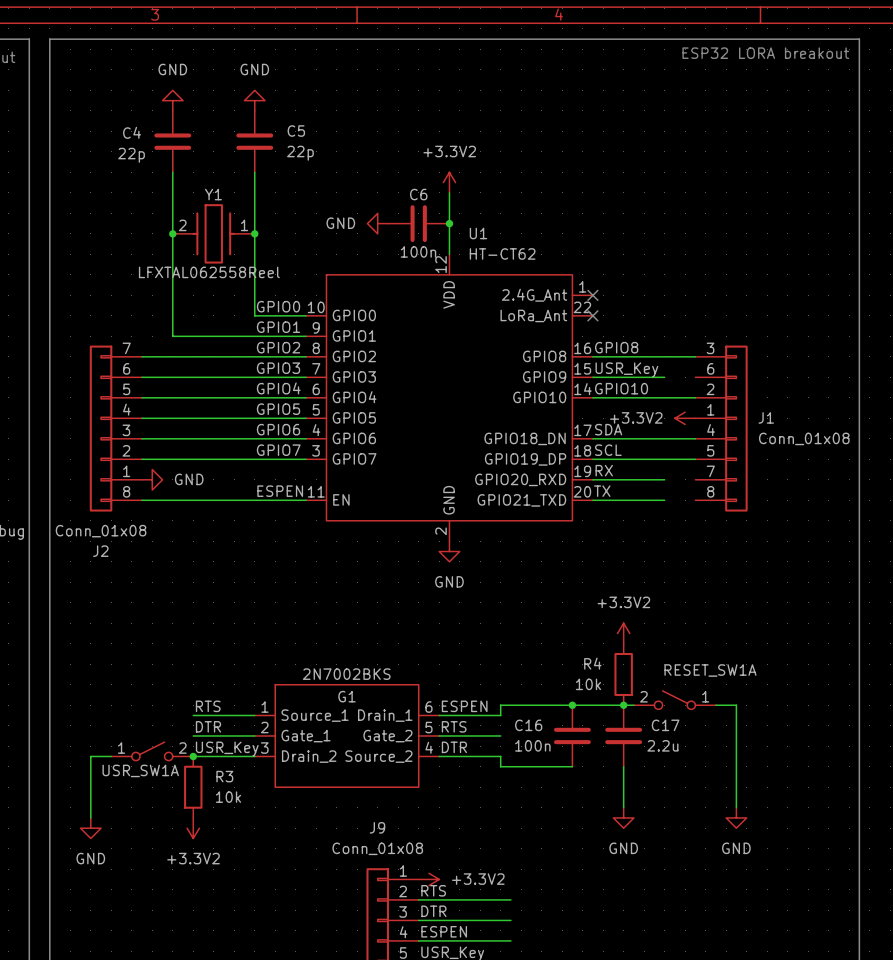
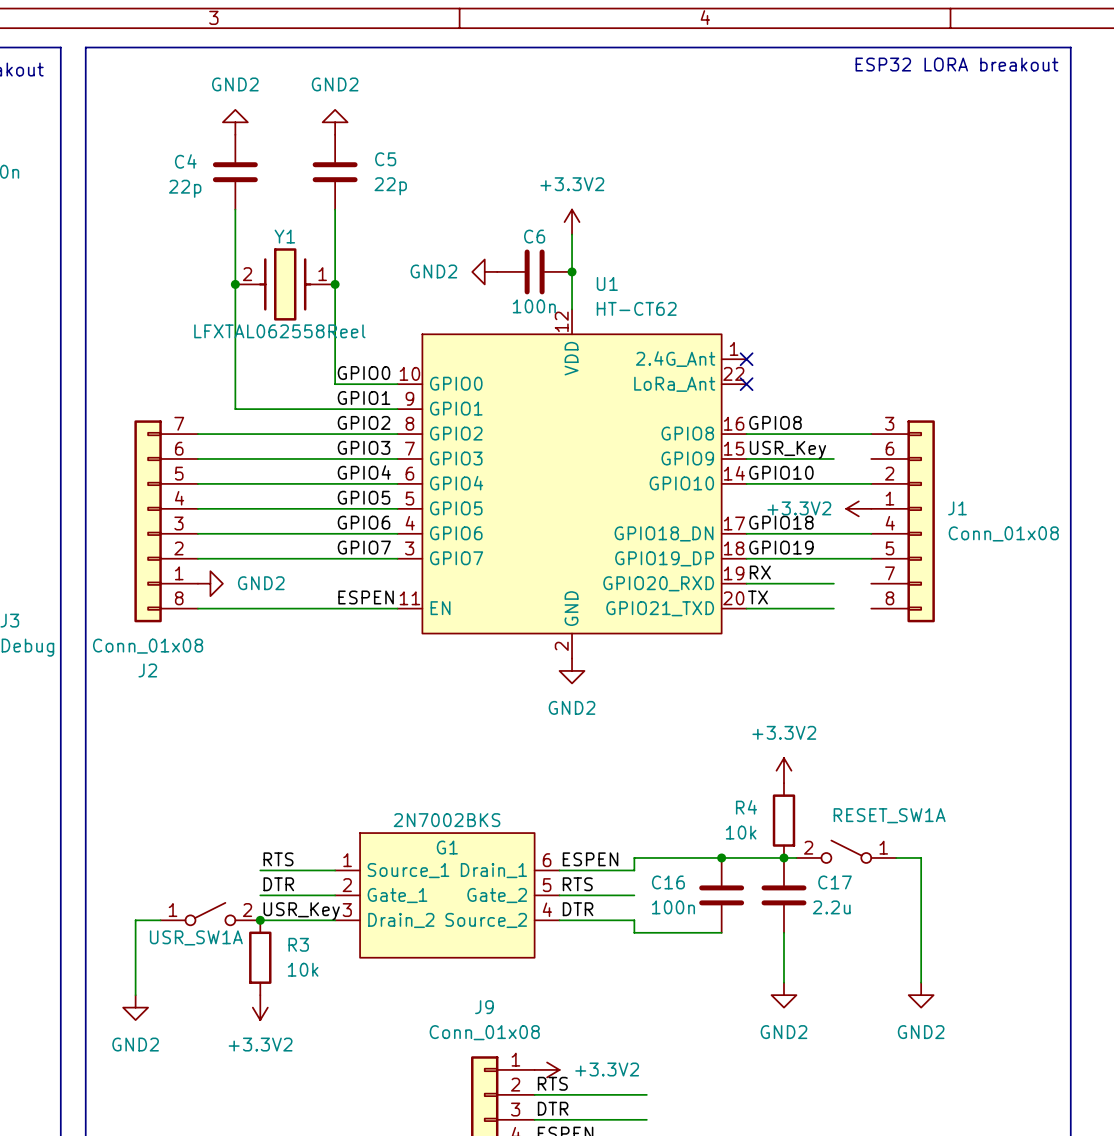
power symbol: GND (172, 100) -> GND2 (235, 122)
power symbol: GND (254, 100) -> GND2 (335, 122)
power symbol: GND (377, 223) -> GND2 (484, 271)
label: SDA (608, 429) -> GPIO18 (781, 522)
label: SCL (608, 450) -> GPIO19 (781, 547)
power symbol: GND (152, 479) -> GND2 (210, 583)
power symbol: GND (449, 551) -> GND2 (572, 670)
power symbol: GND (623, 817) -> GND2 (783, 995)
power symbol: GND (736, 817) -> GND2 (921, 995)
power symbol: GND (90, 828) -> GND2 (135, 1007)

